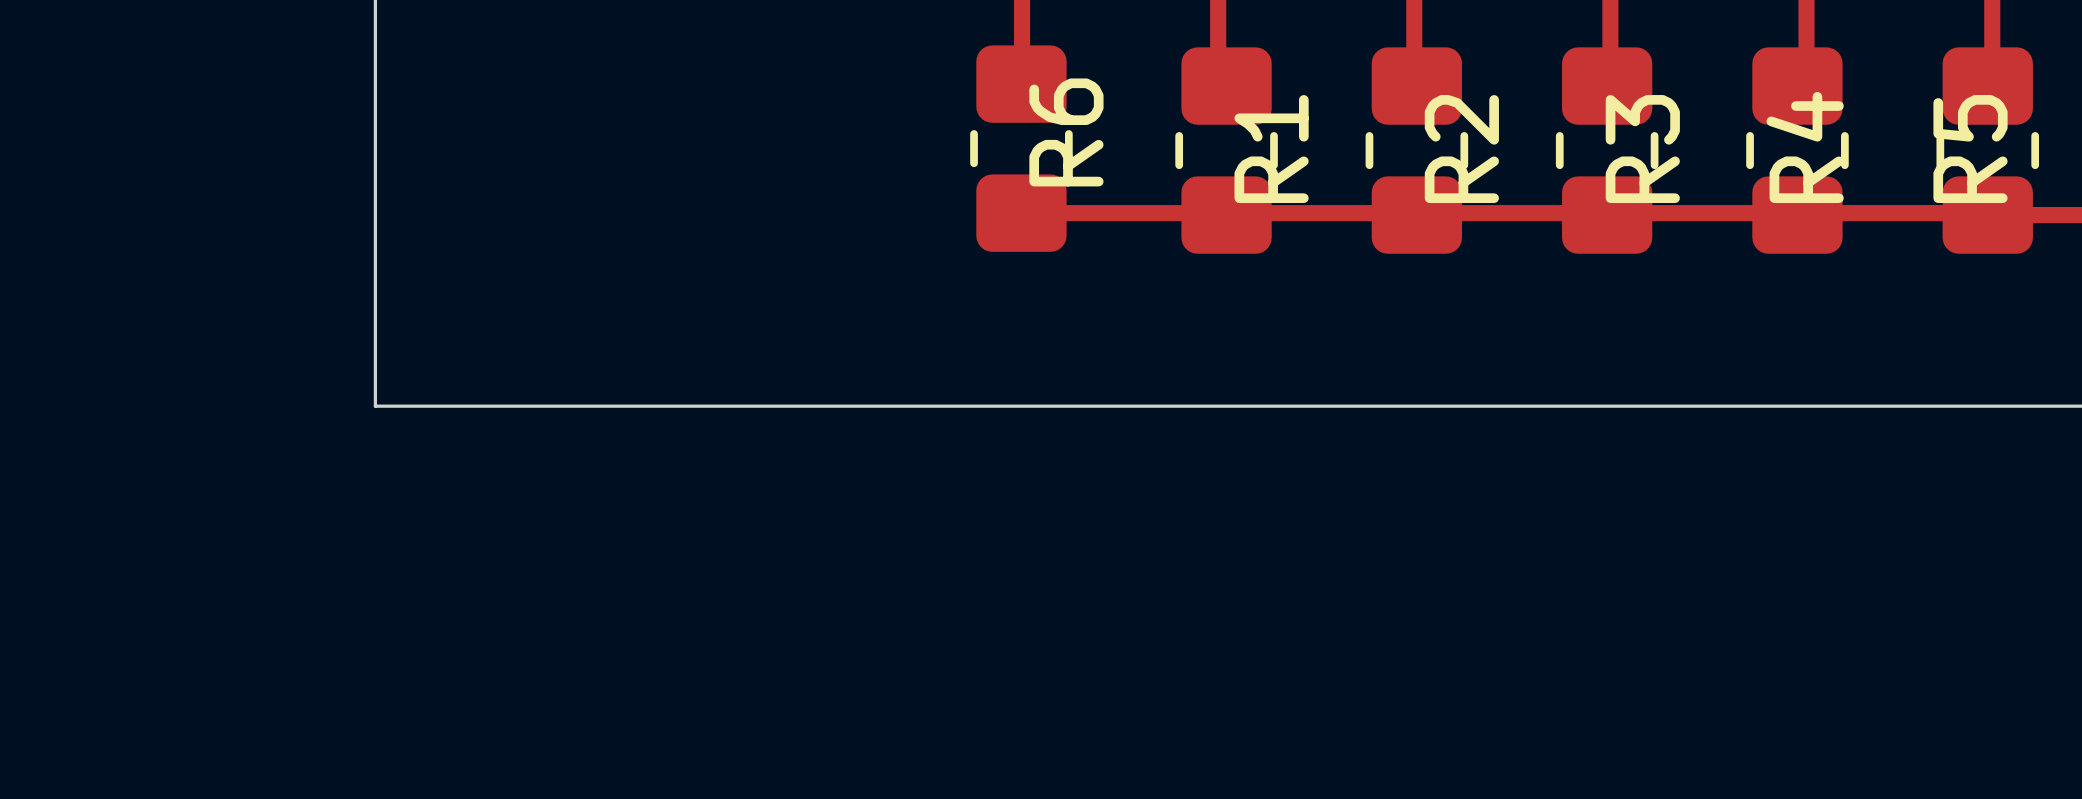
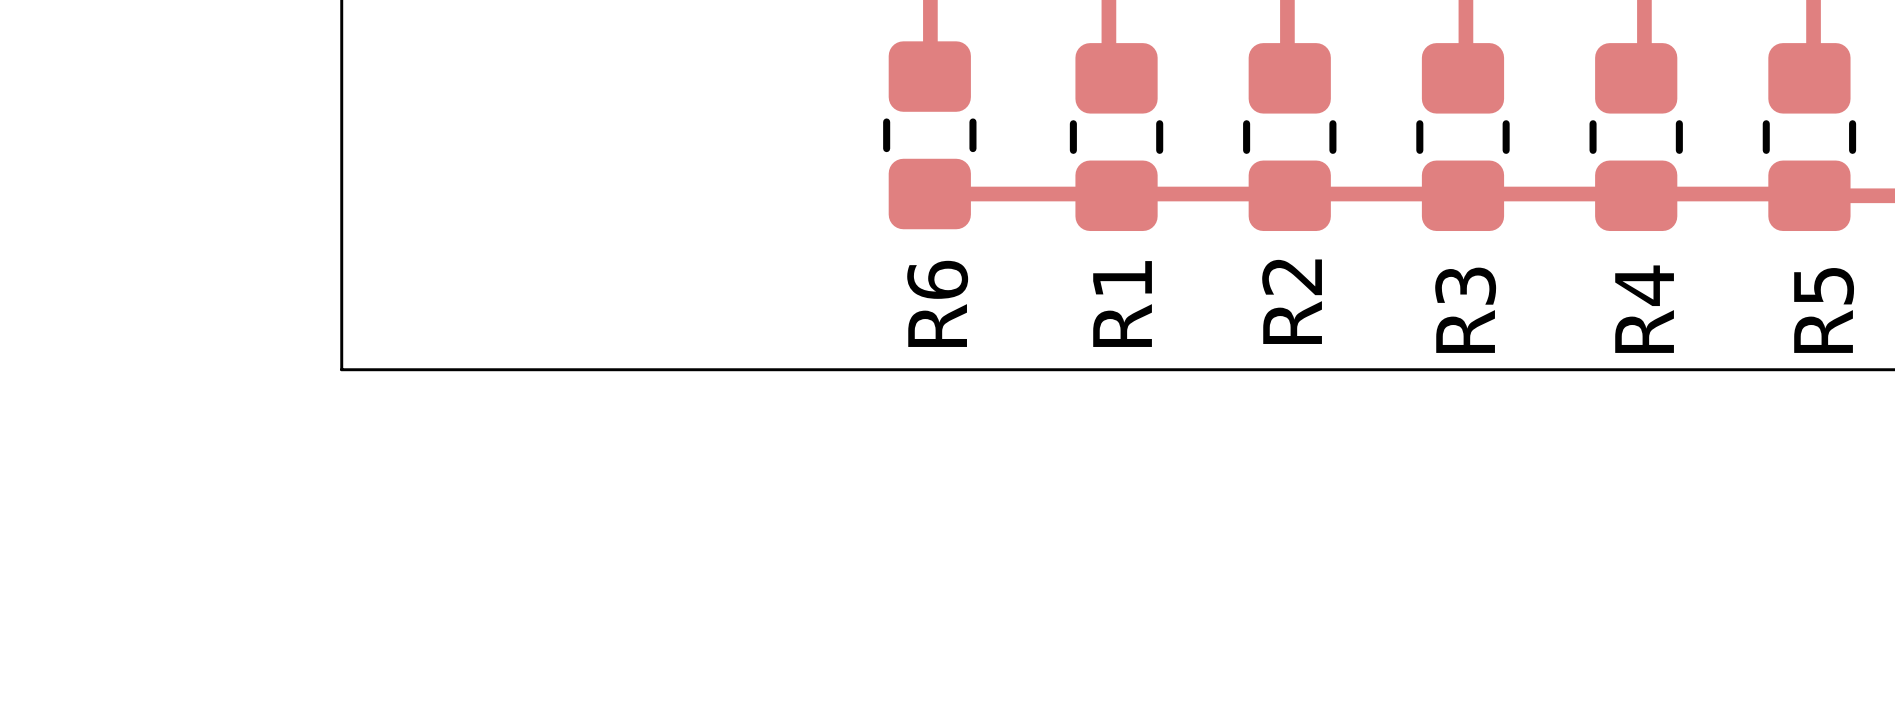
R6 name position: R6 (1066, 132) -> R6 (937, 303)
R4 name position: R4 (1805, 147) -> R4 (1644, 309)
R1 name position: R1 (1271, 149) -> R1 (1122, 304)
R2 name position: R2 (1461, 149) -> R2 (1292, 301)
R3 name position: R3 (1642, 149) -> R3 (1465, 310)
R5 name position: R5 (1970, 149) -> R5 (1824, 310)

